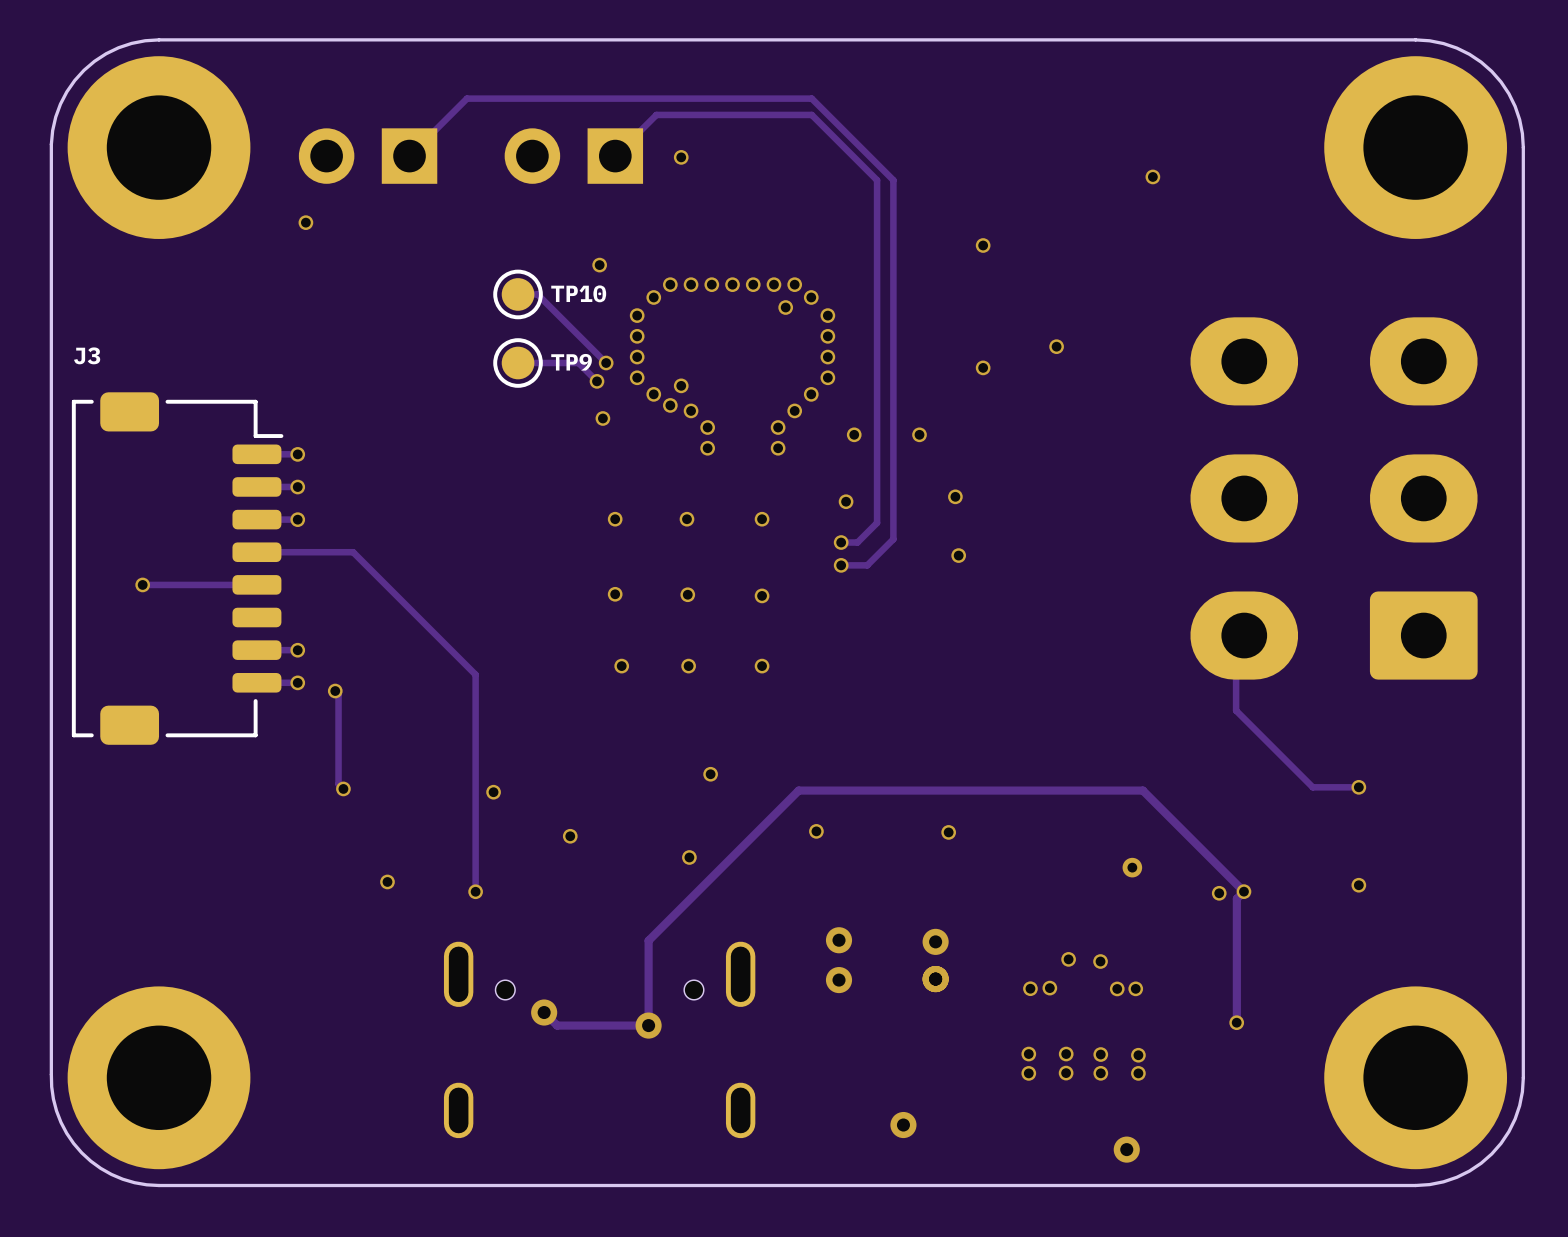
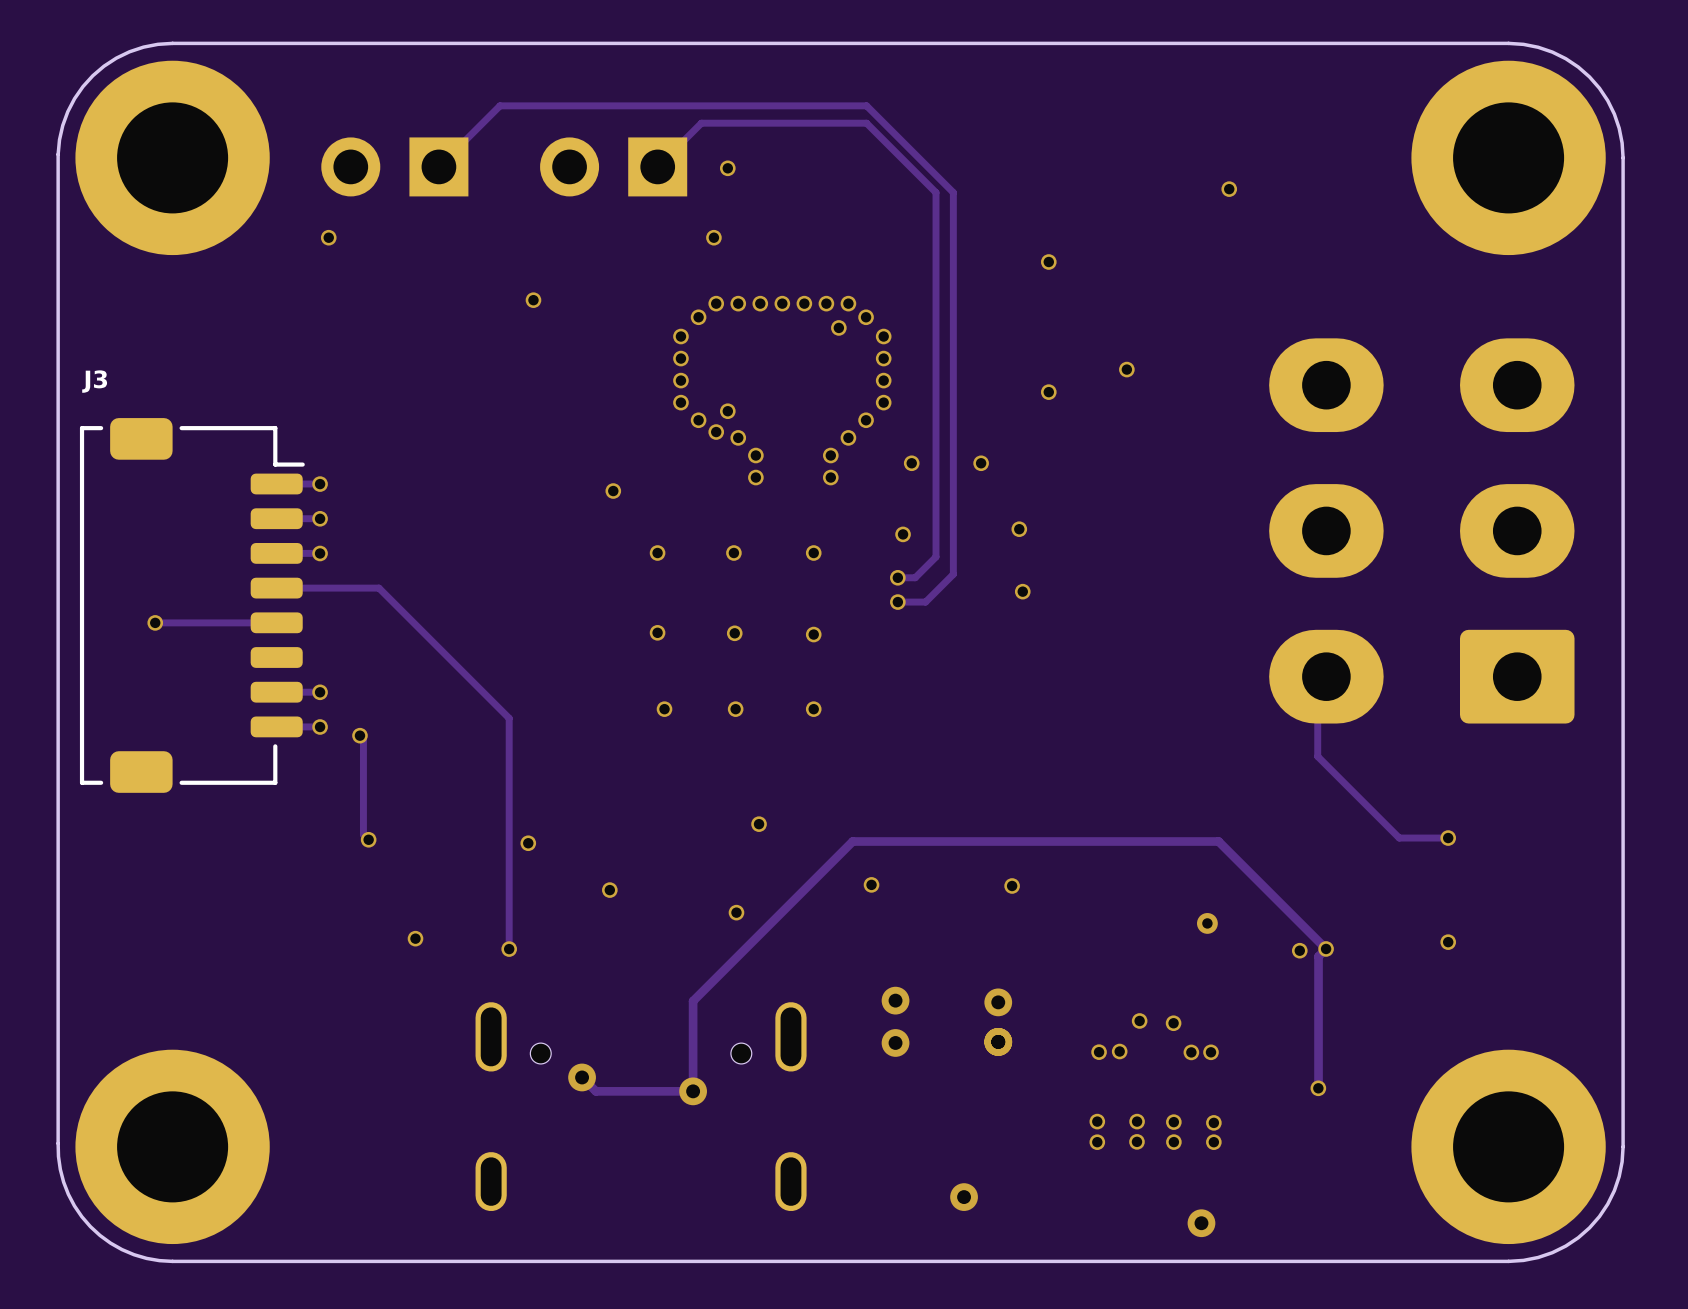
via: none -> (713, 237)
via: (599, 265) -> none
via: none -> (533, 300)
track: (518, 294) (537, 294) (606, 363) -> none
TP10: (518, 294) -> none
track: (518, 363) (578, 363) (596, 381) -> none
TP9: (518, 363) -> none
via: (606, 363) -> none
via: (596, 381) -> none
via: (602, 418) -> none
via: none -> (613, 491)

